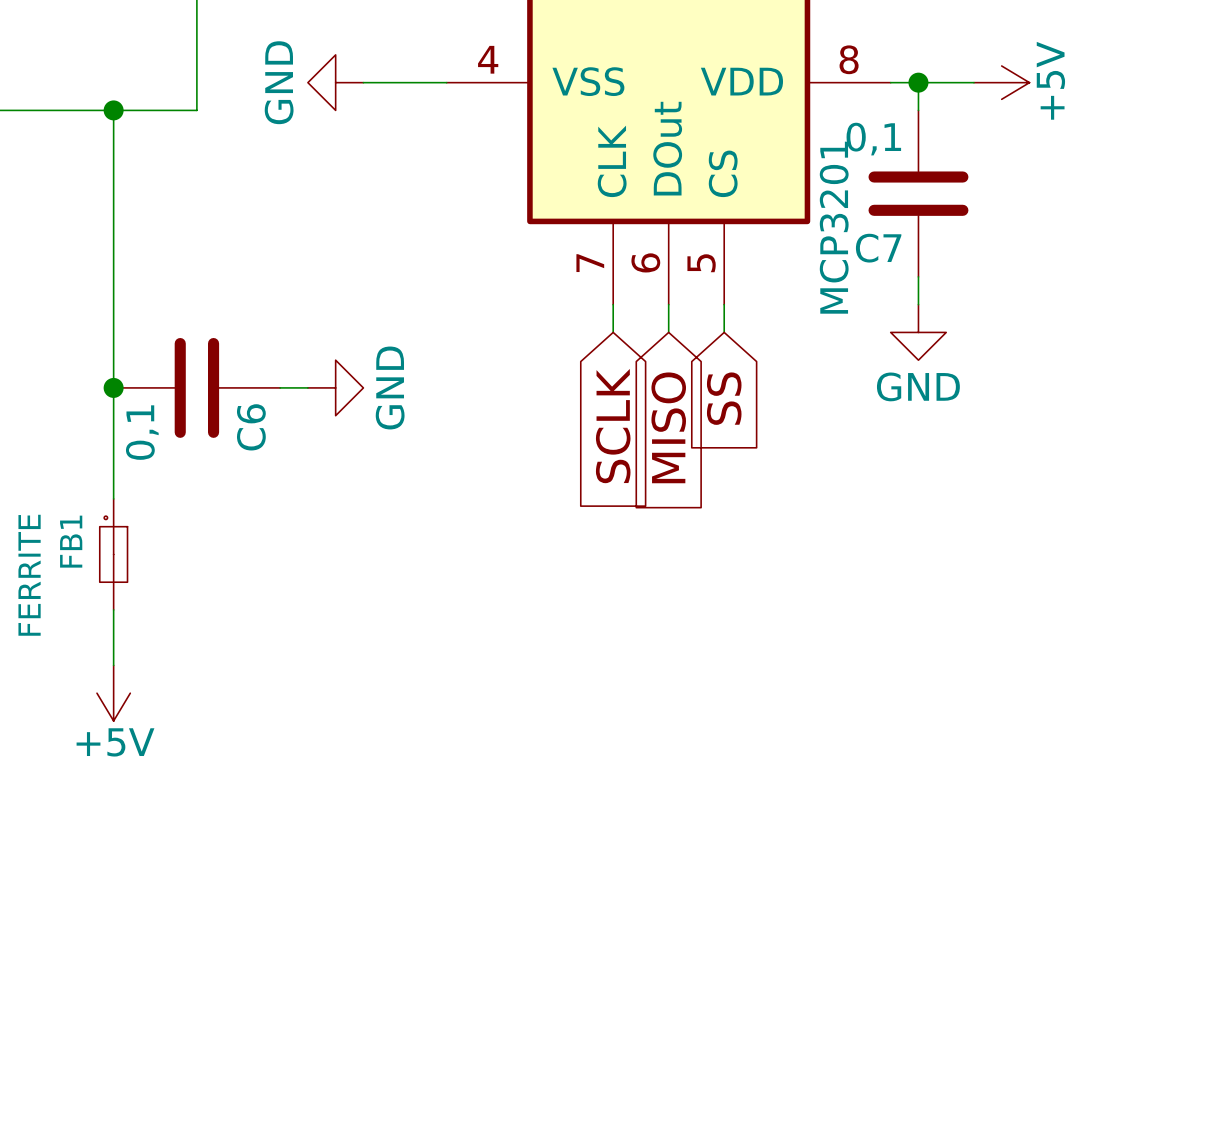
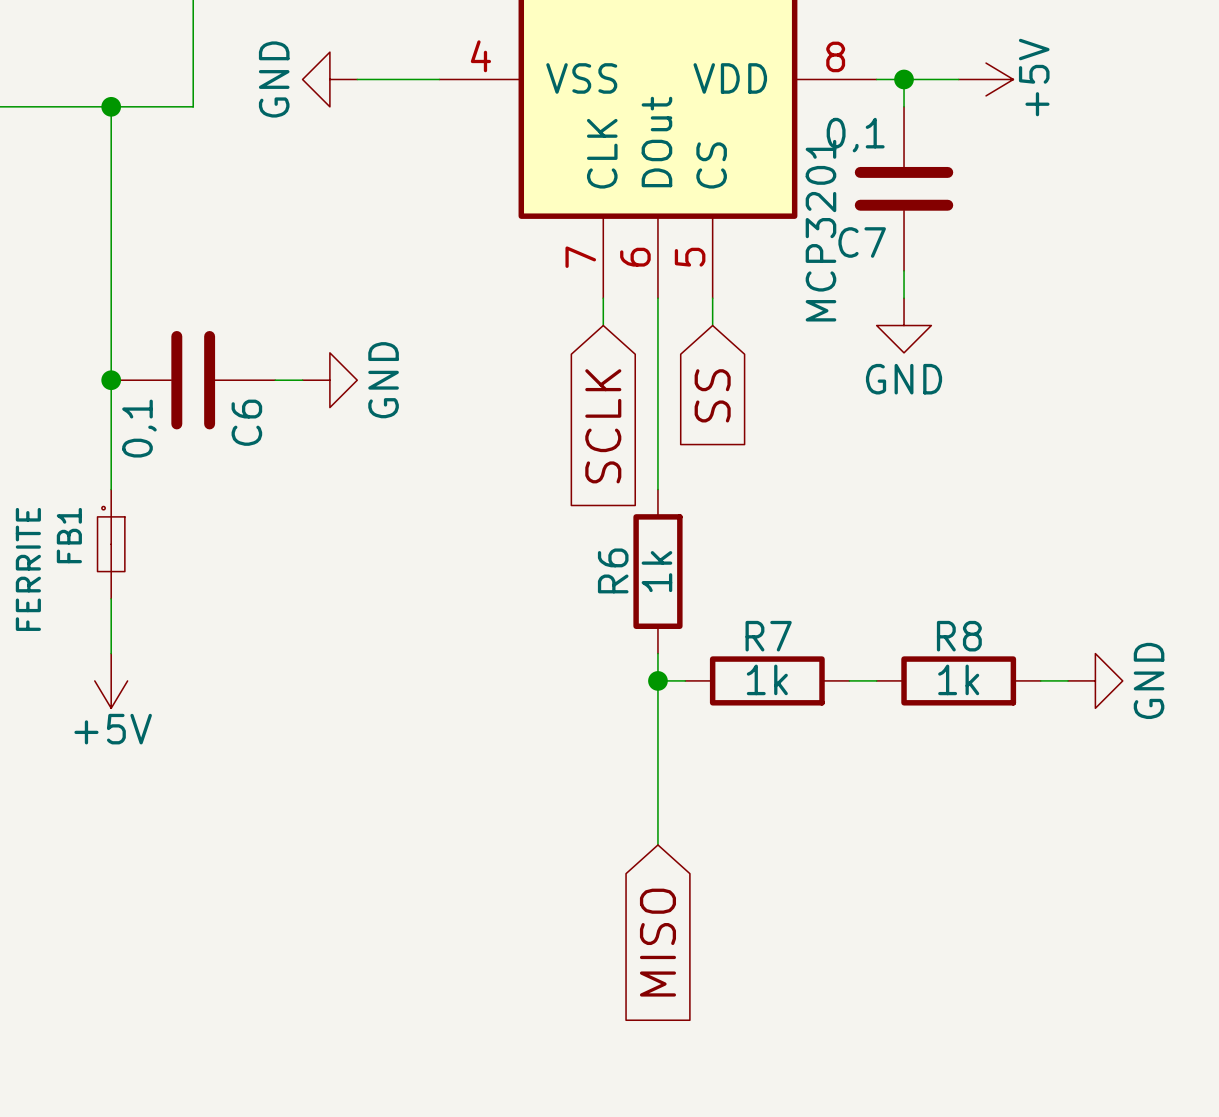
wire: none -> (657, 325) (657, 489)
global label position: MISO (668, 427) -> MISO (657, 942)
R6: none -> 1k (657, 571)
wire: none -> (657, 653) (657, 844)
wire: none -> (657, 680) (685, 680)
junction: none -> (657, 680)
R7: none -> 1k (767, 680)
wire: none -> (849, 680) (876, 680)
R8: none -> 1k (958, 680)
wire: none -> (1040, 680) (1068, 680)
power symbol: none -> GND (1095, 680)

